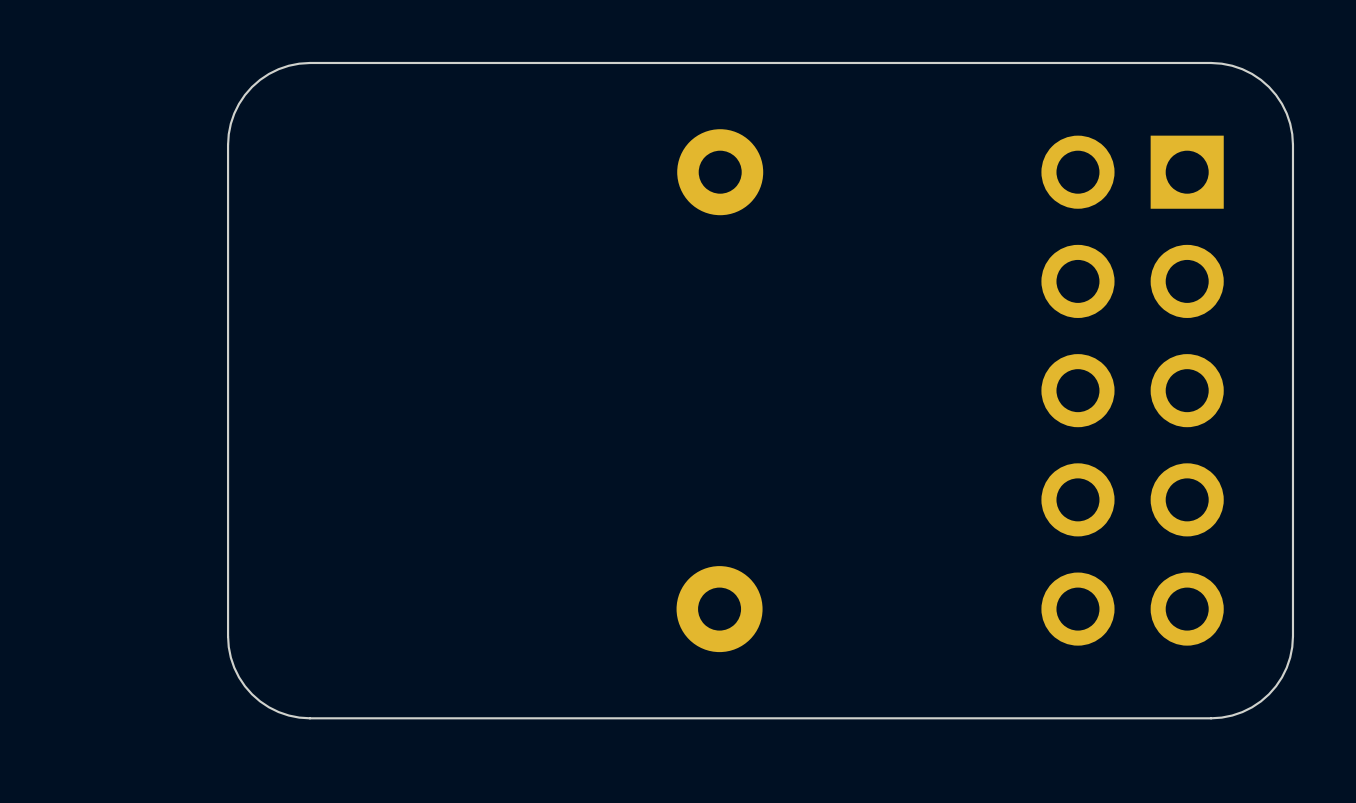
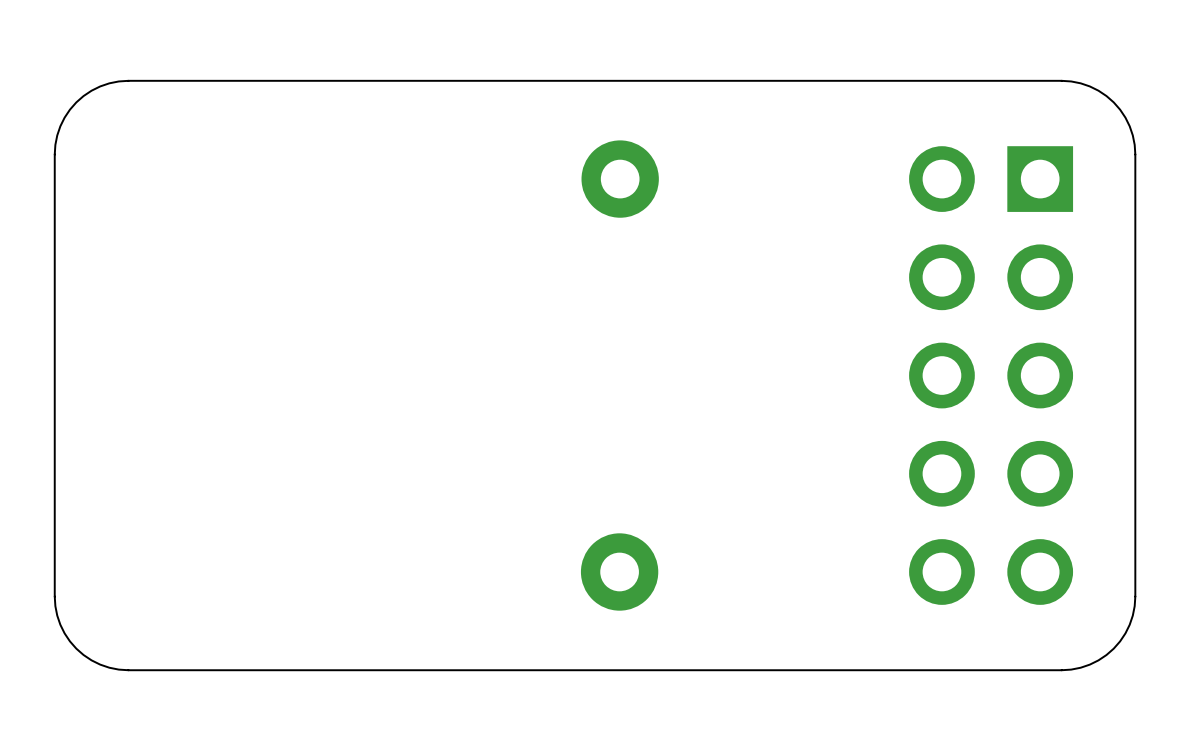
board edge: (309, 62) (278, 69) (252, 86) (234, 113) (228, 144) (228, 647) (239, 677) (260, 701) (288, 715) (309, 718) -> (251, 80) (128, 80) (100, 86) (76, 102) (64, 117) (57, 135) (54, 154) (54, 596) (60, 624) (69, 641) (83, 655) (109, 667) (128, 670) (251, 670)

